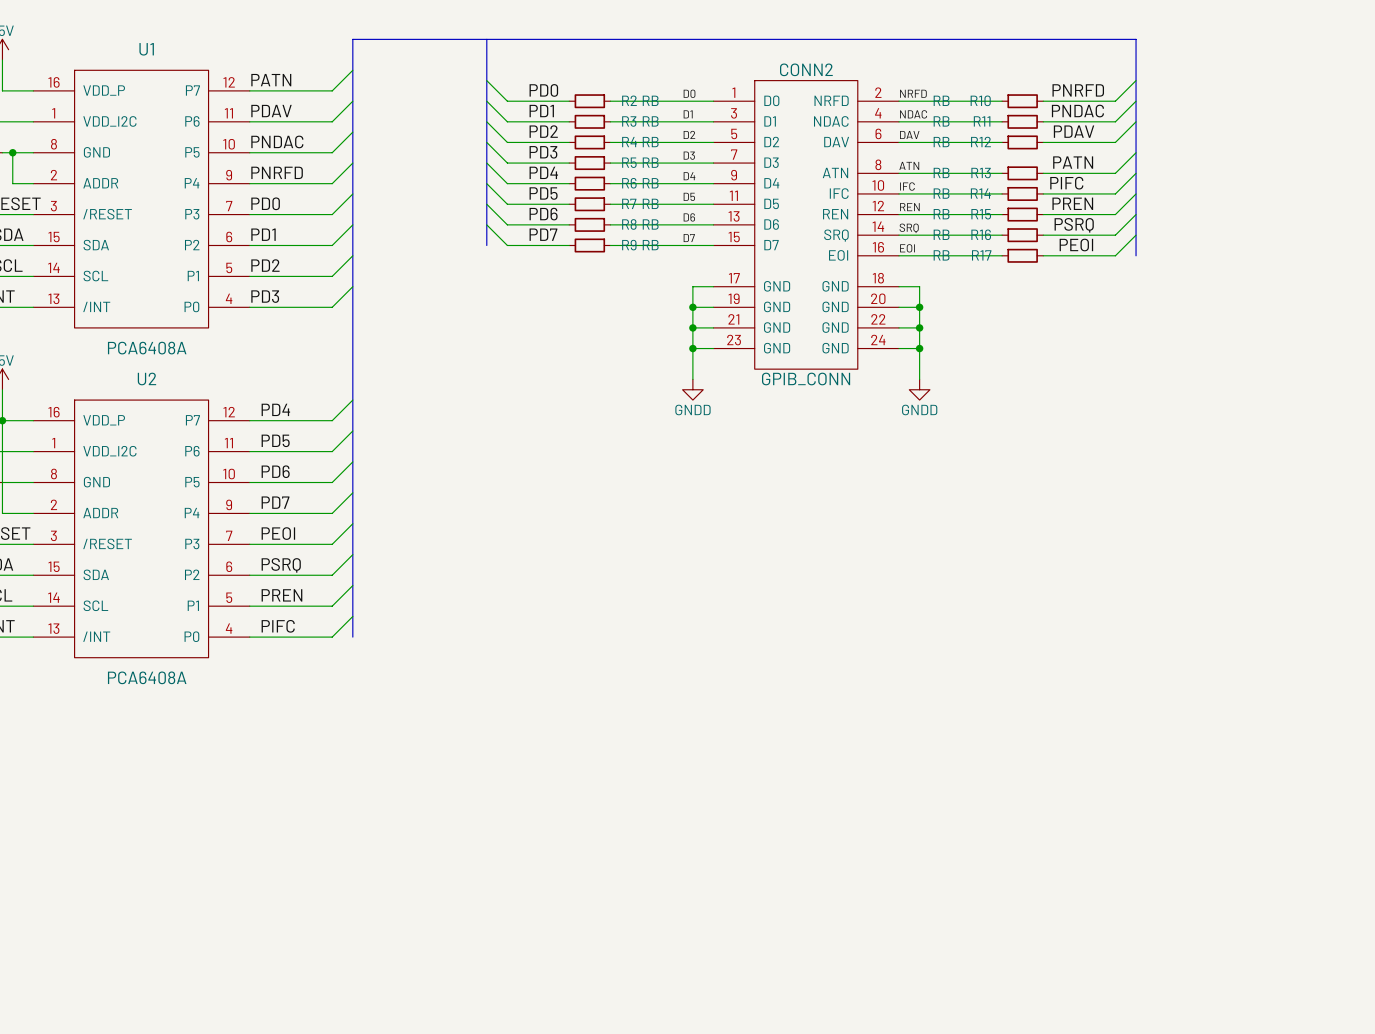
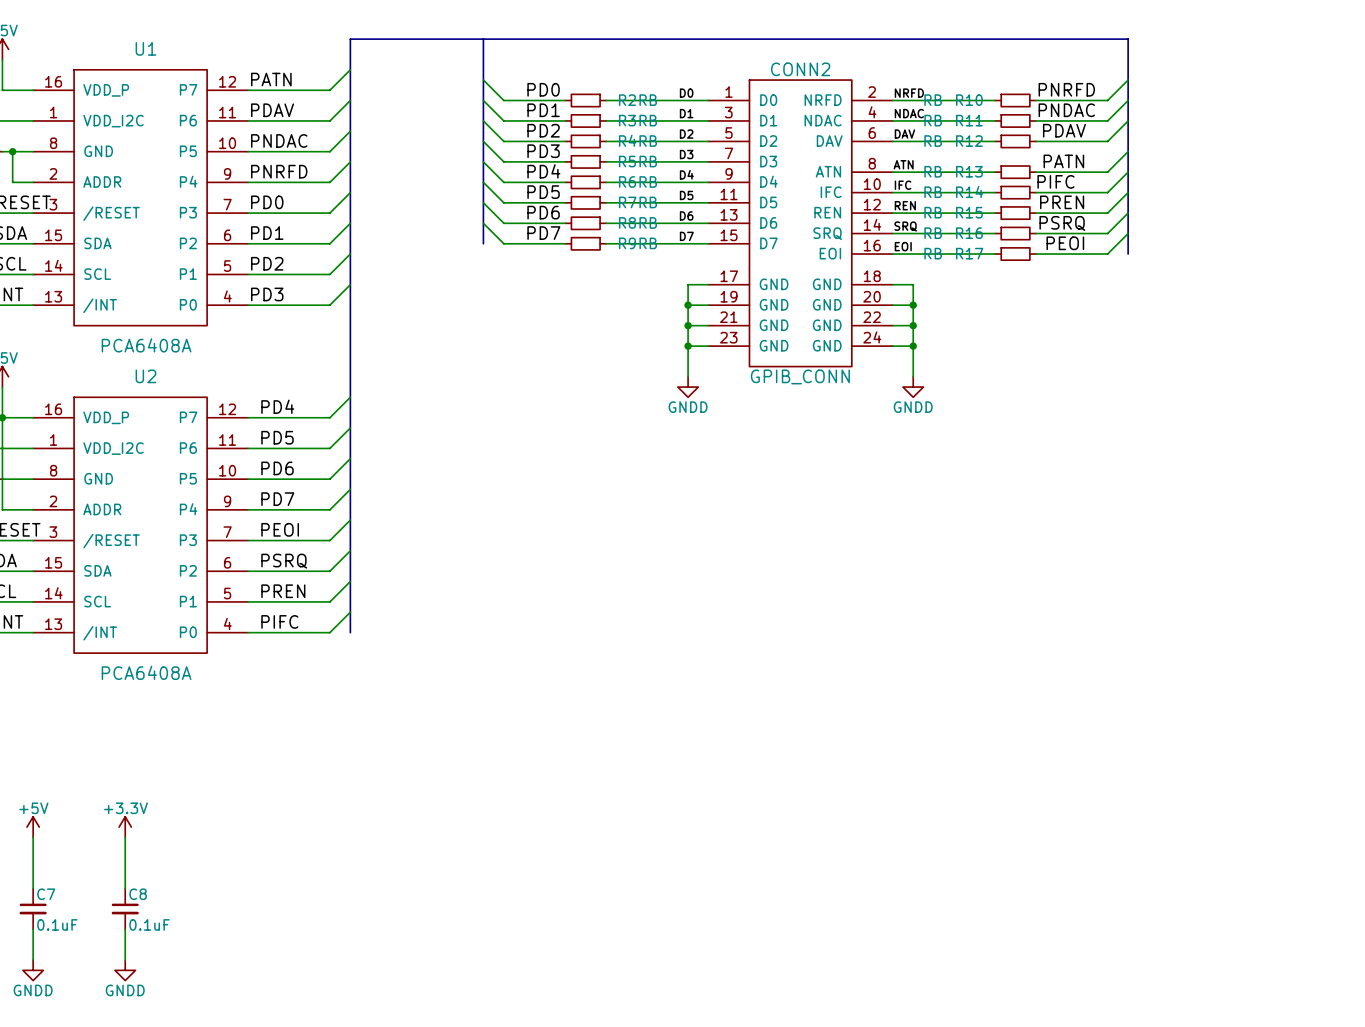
power symbol: none -> +5V (33, 827)
power symbol: none -> +3.3V (125, 827)
wire: none -> (33, 837) (33, 888)
wire: none -> (125, 837) (125, 888)
C7: none -> 0.1uF (33, 908)
C8: none -> 0.1uF (125, 908)
wire: none -> (33, 929) (33, 960)
wire: none -> (125, 929) (125, 960)
power symbol: none -> GNDD (33, 970)
power symbol: none -> GNDD (125, 970)

